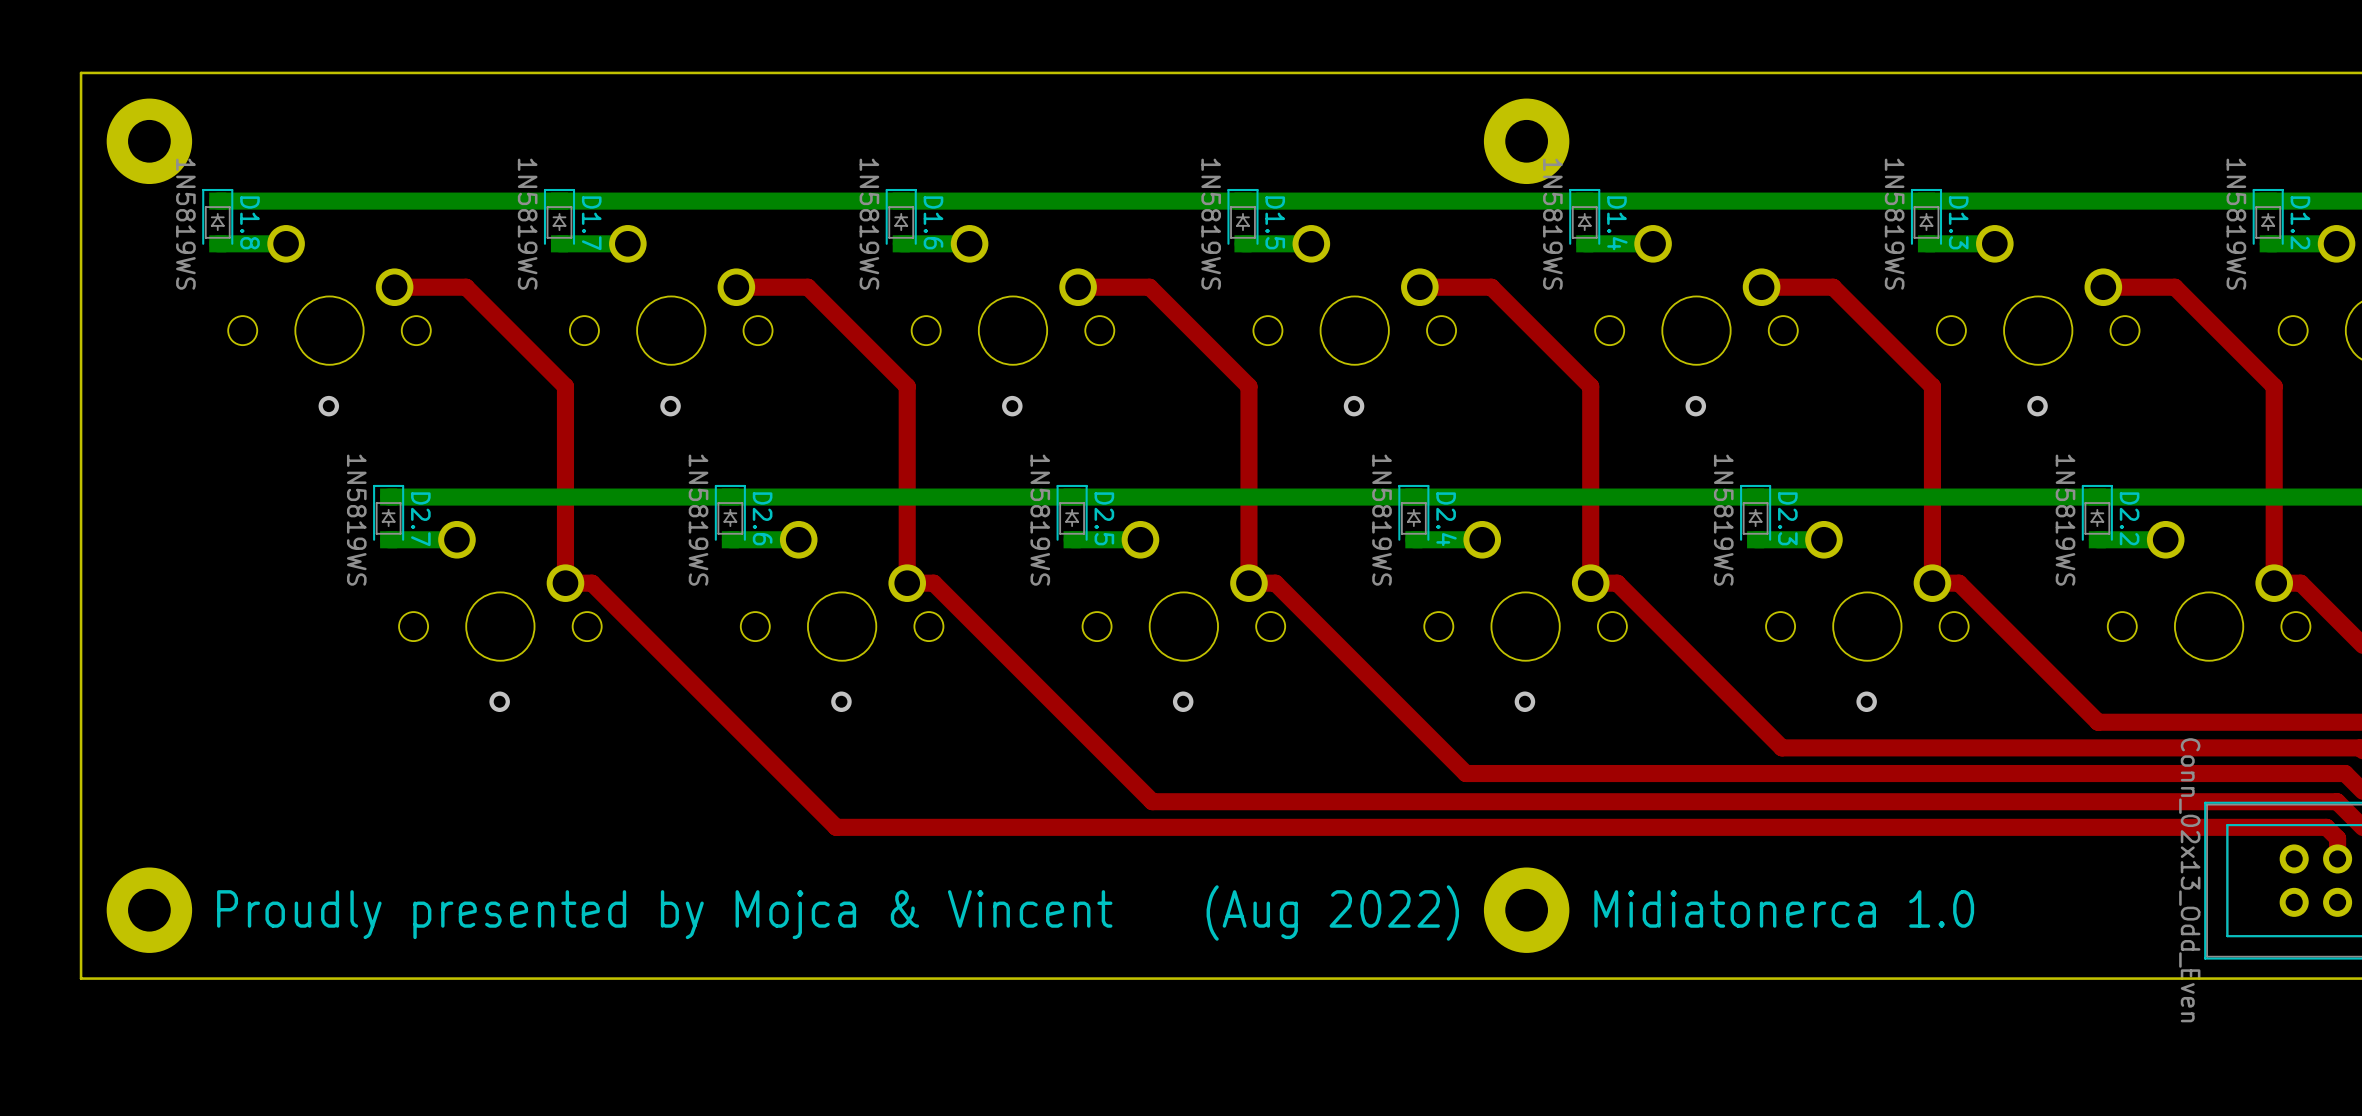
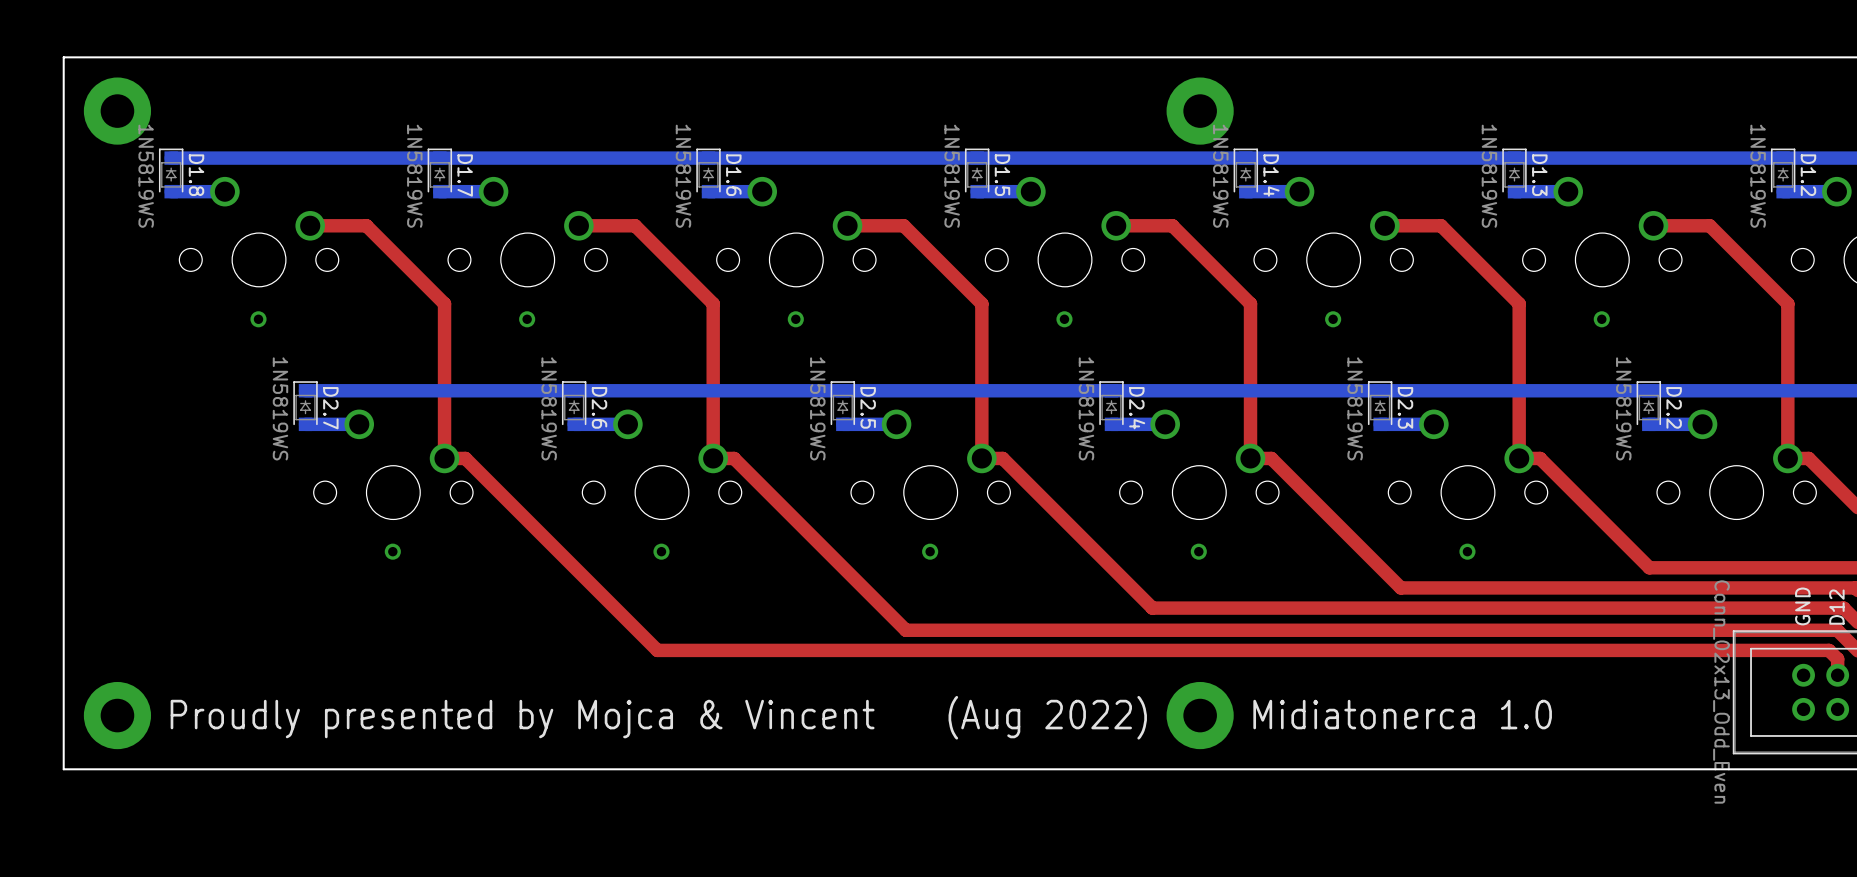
text: none -> GND (1802, 606)
text: none -> D12 (1836, 607)

